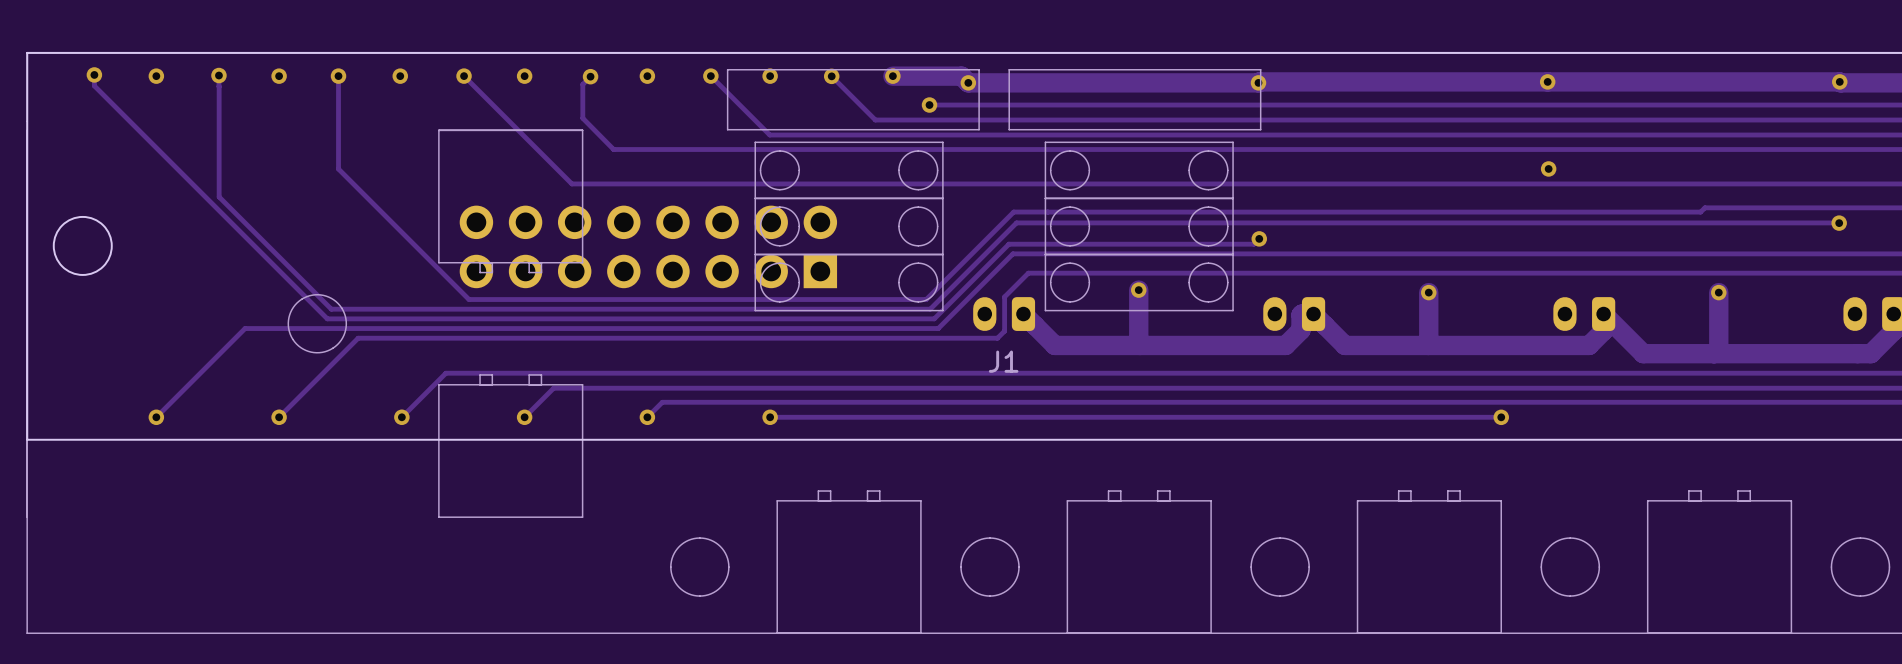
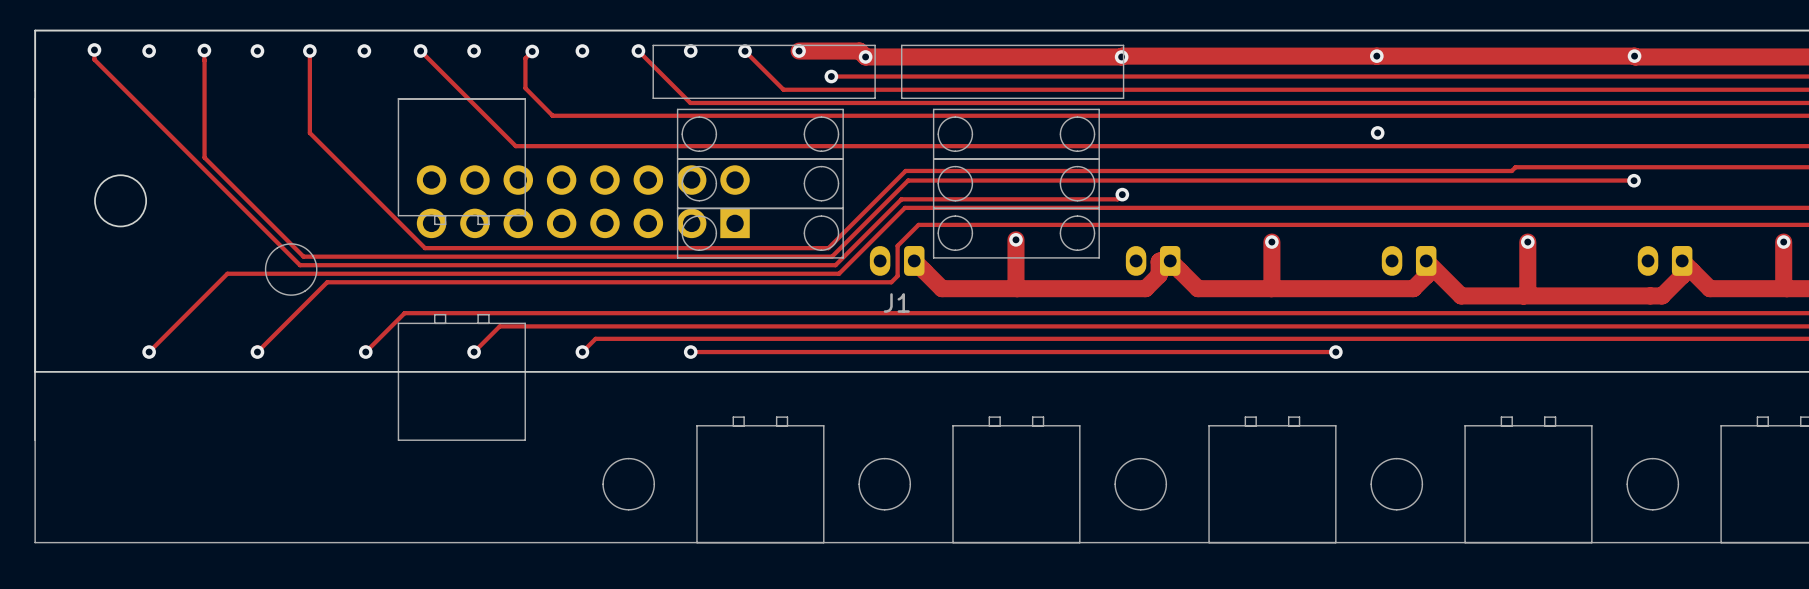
round board edge position: (82, 245) -> (120, 200)

